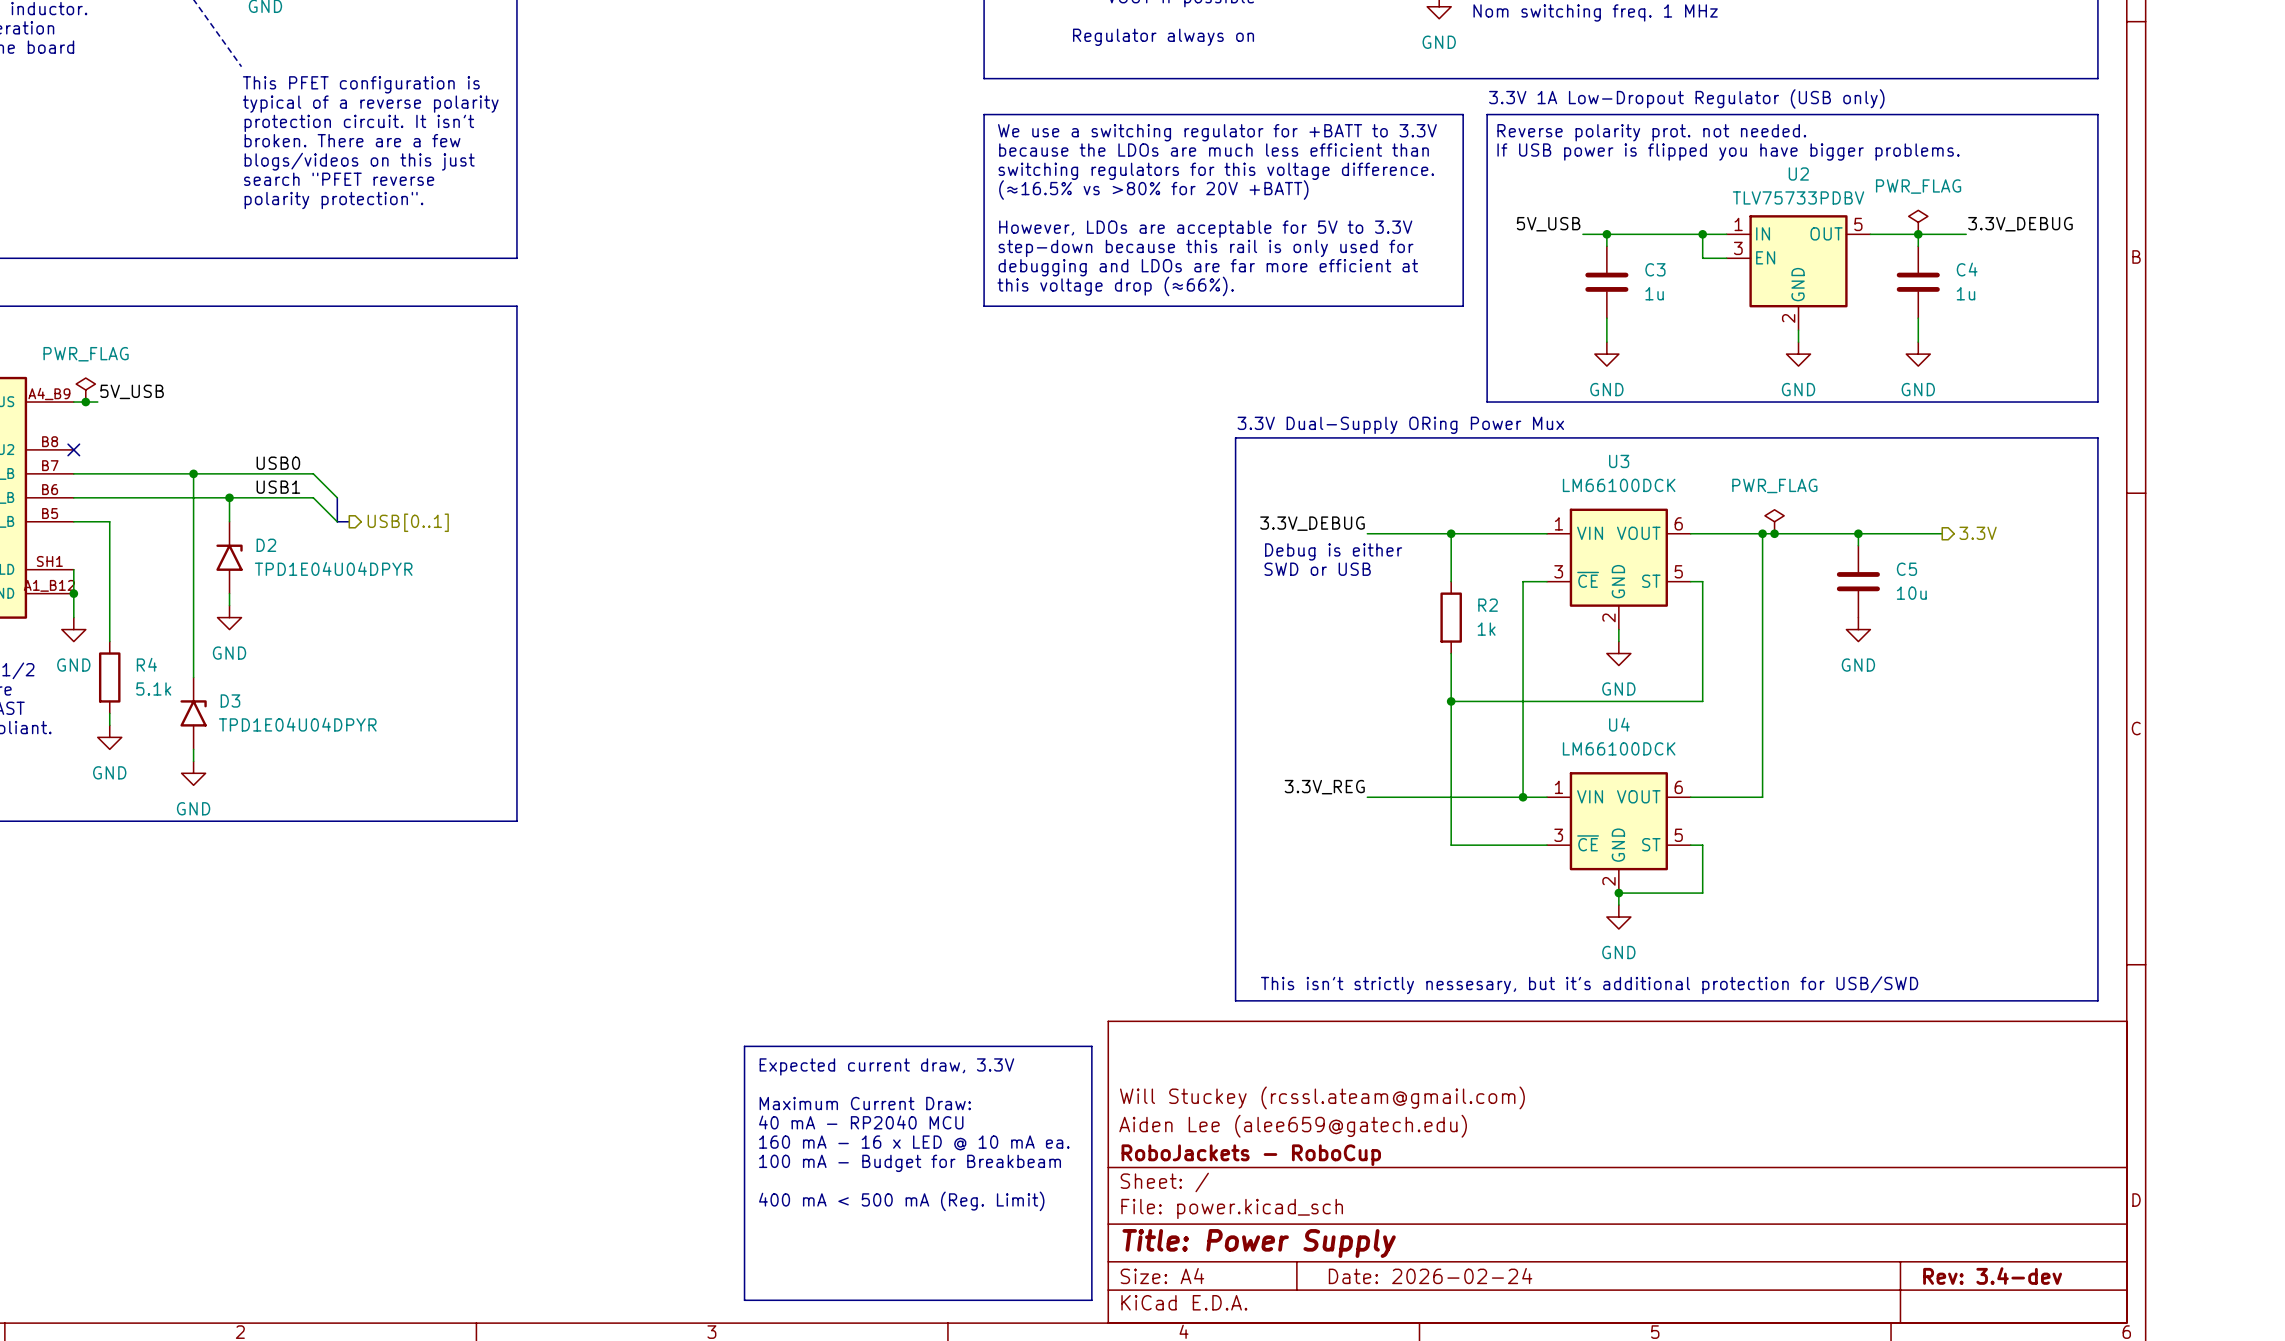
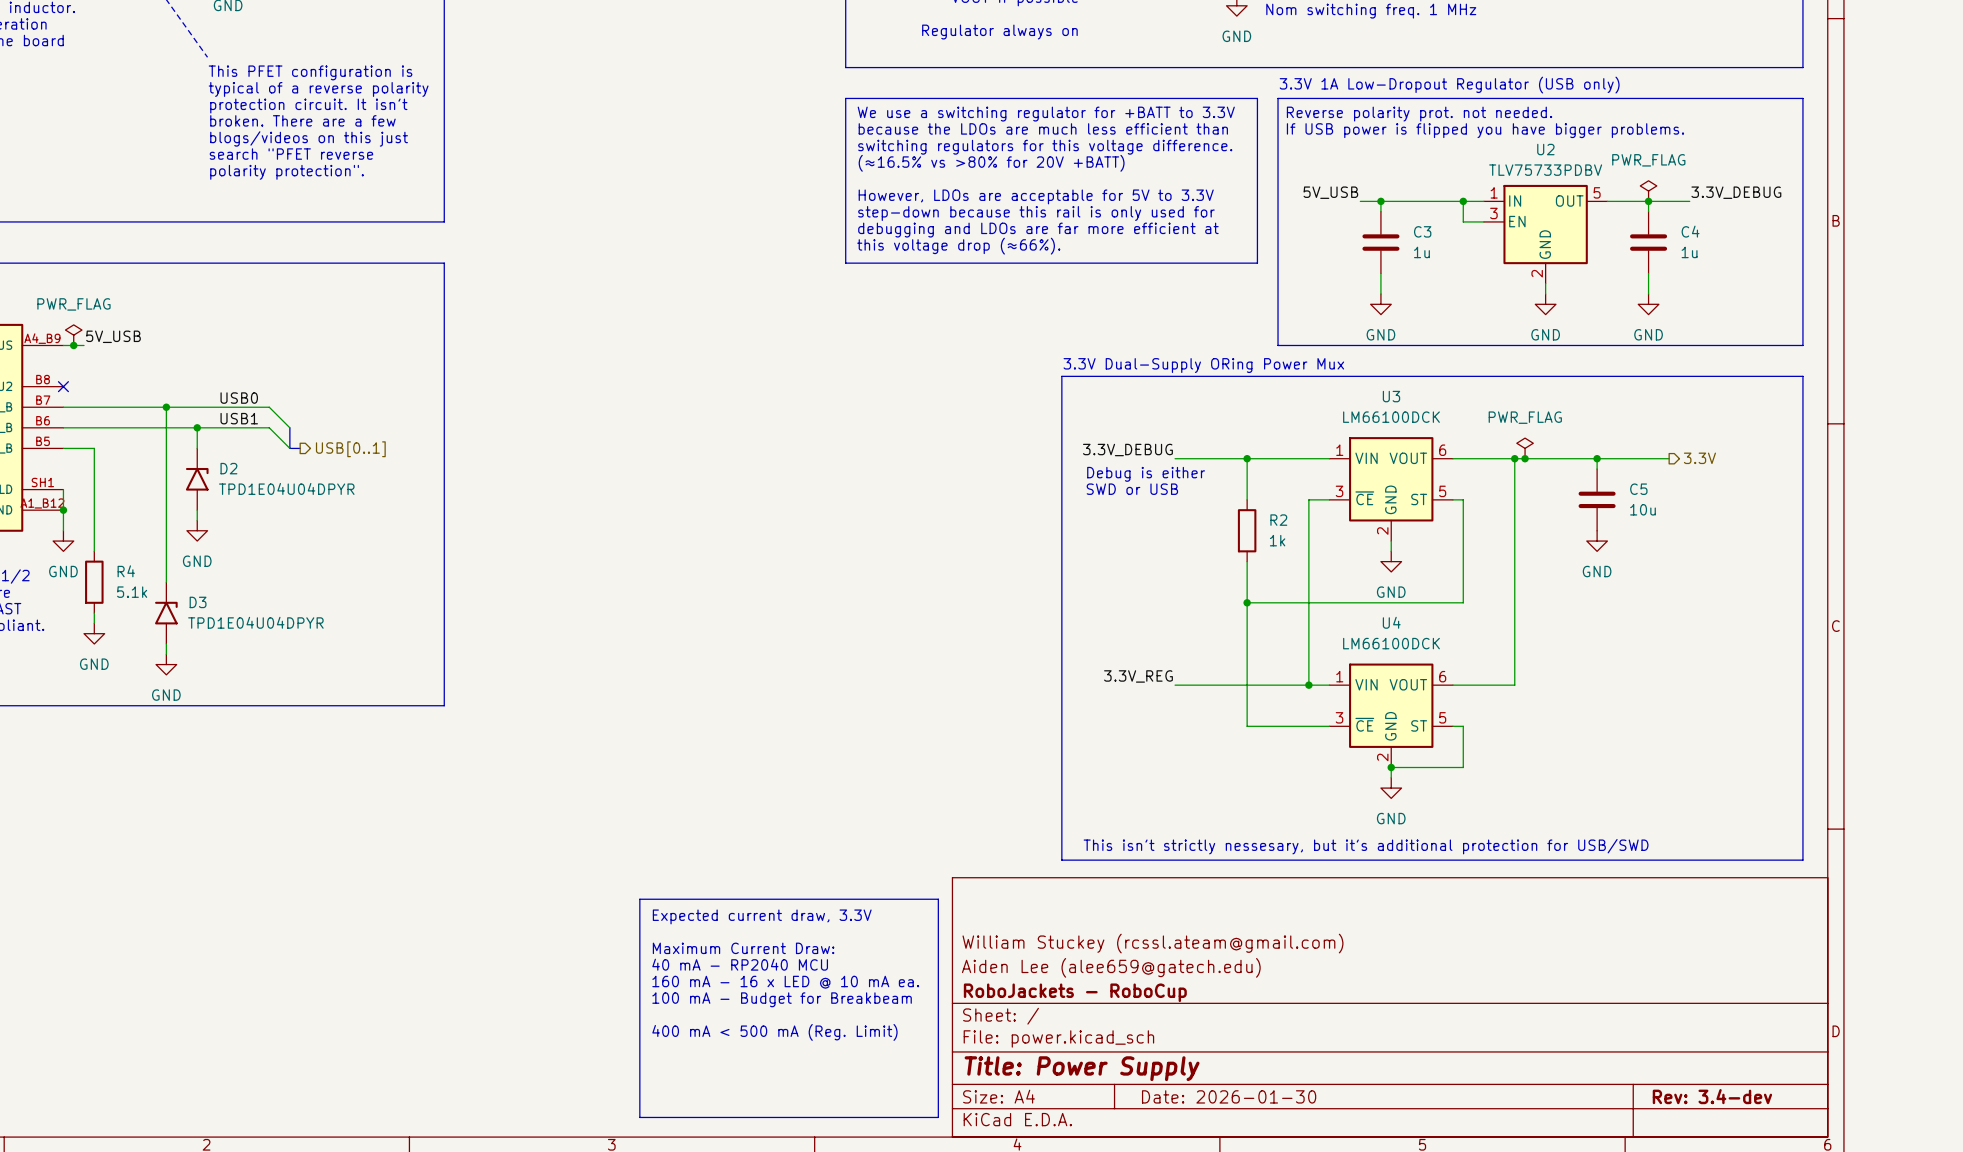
title block: Will Stuckey (rcssl.ateam@gmail.com) (1322, 1097) -> William Stuckey (rcssl.ateam@gmail.com) (1152, 943)
title block: Date: 2026-02-24 (1430, 1276) -> Date: 2026-01-30 (1229, 1096)

